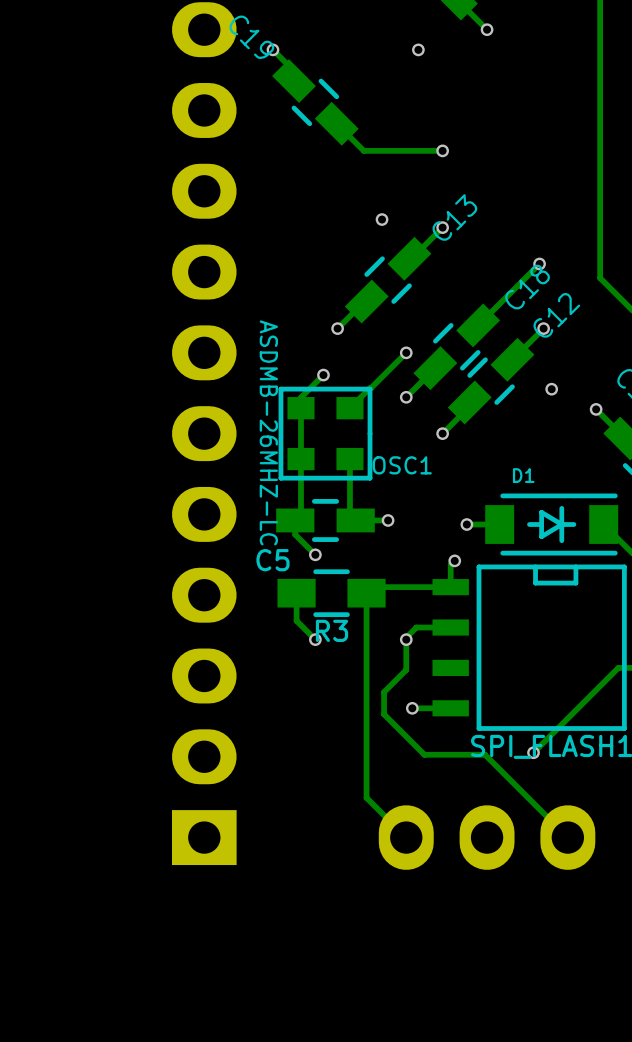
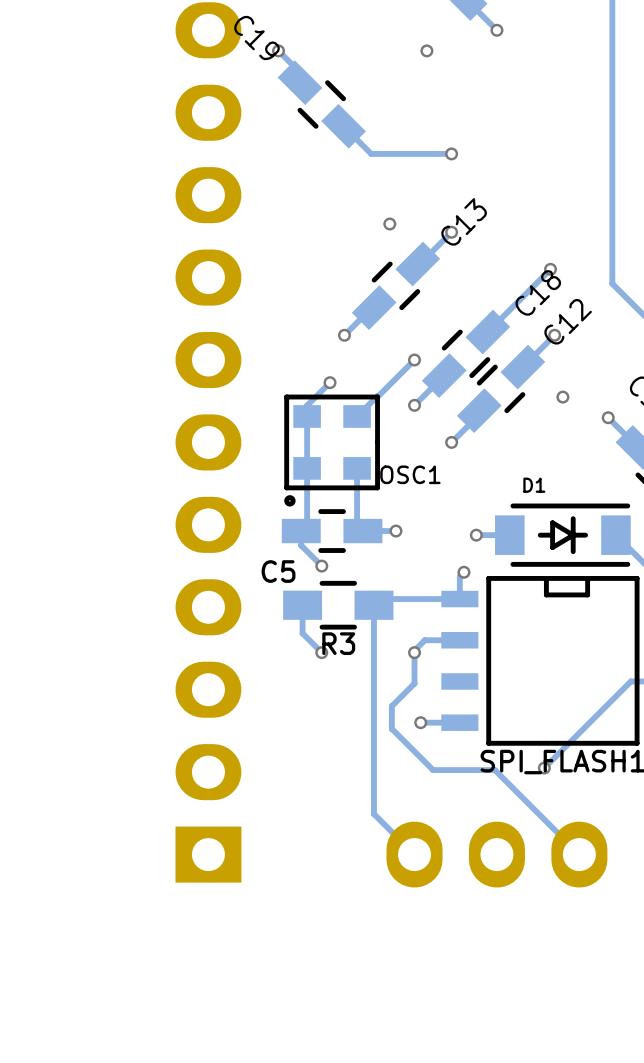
OSC1 footprint: [278, 386, 373, 481] -> [284, 394, 380, 507]
OSC1 value: ASDMB-26MHZ-LC (268, 432) -> none

